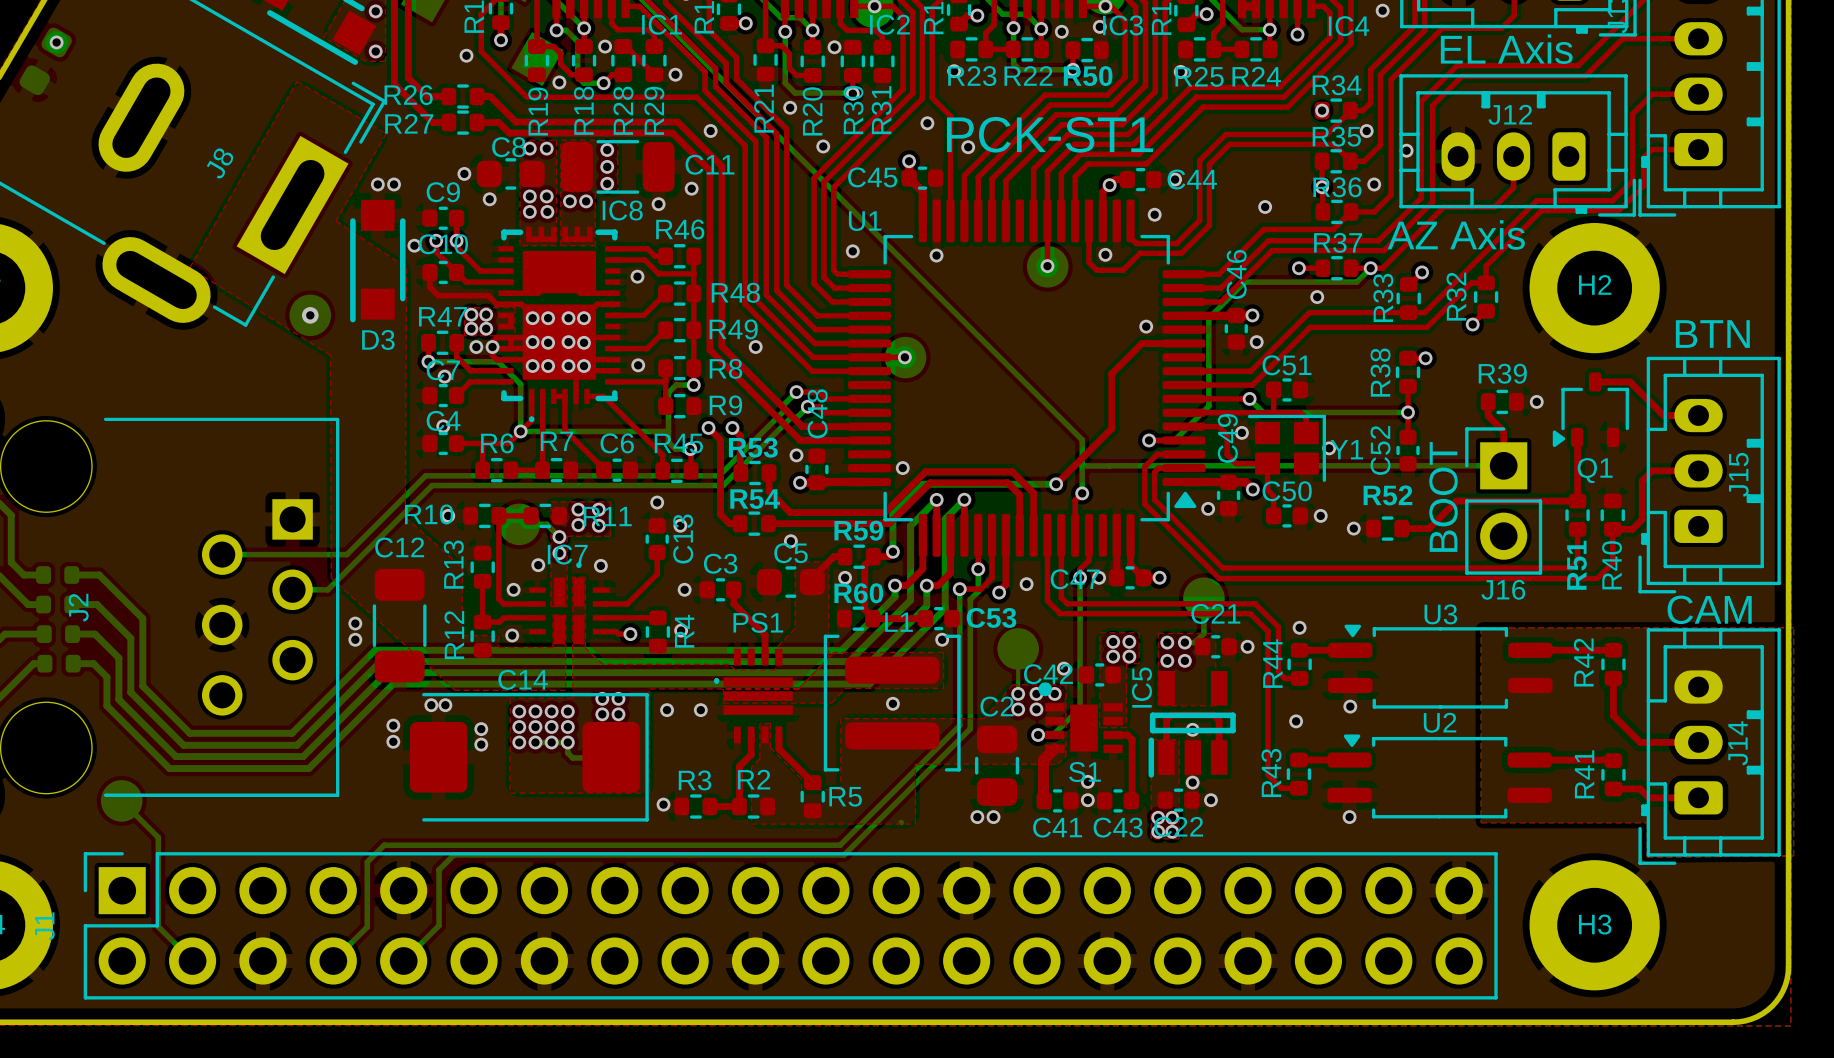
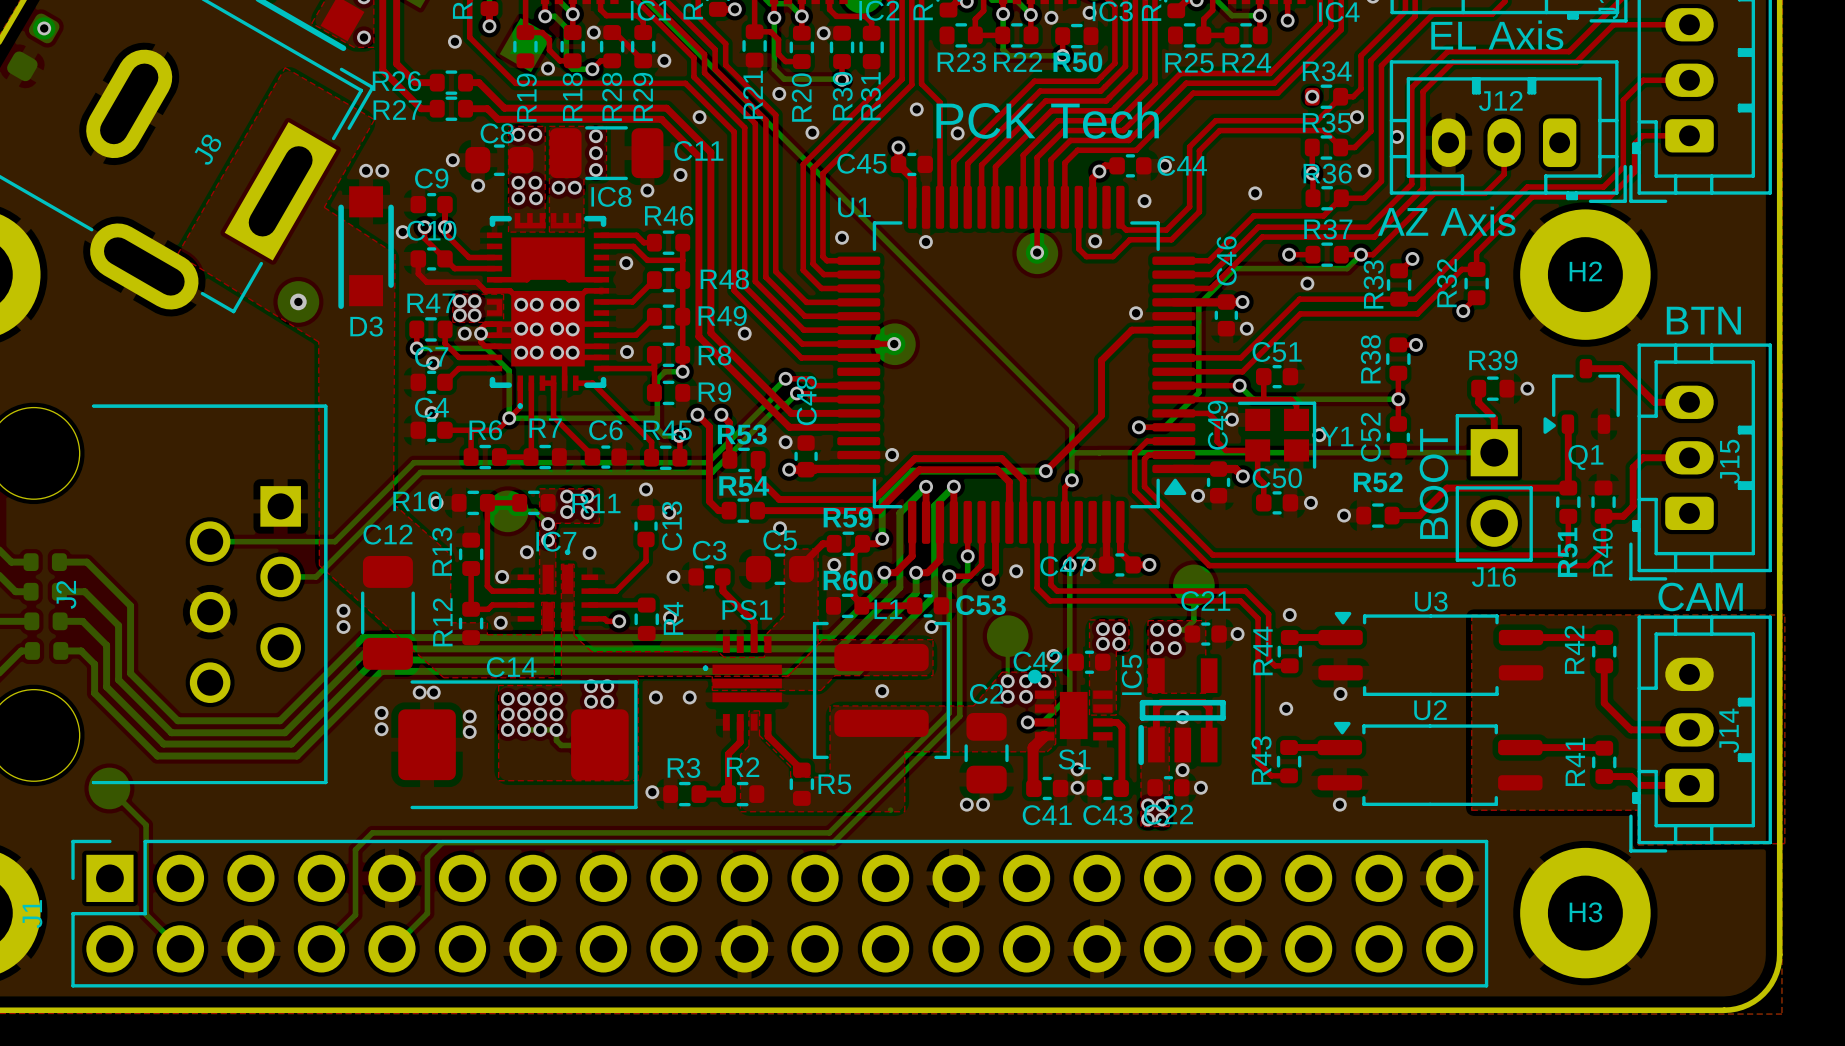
via: (954, 71) -> none
via: (1180, 71) -> none
text: PCK-ST1 (1050, 134) -> PCK Tech (1047, 120)

